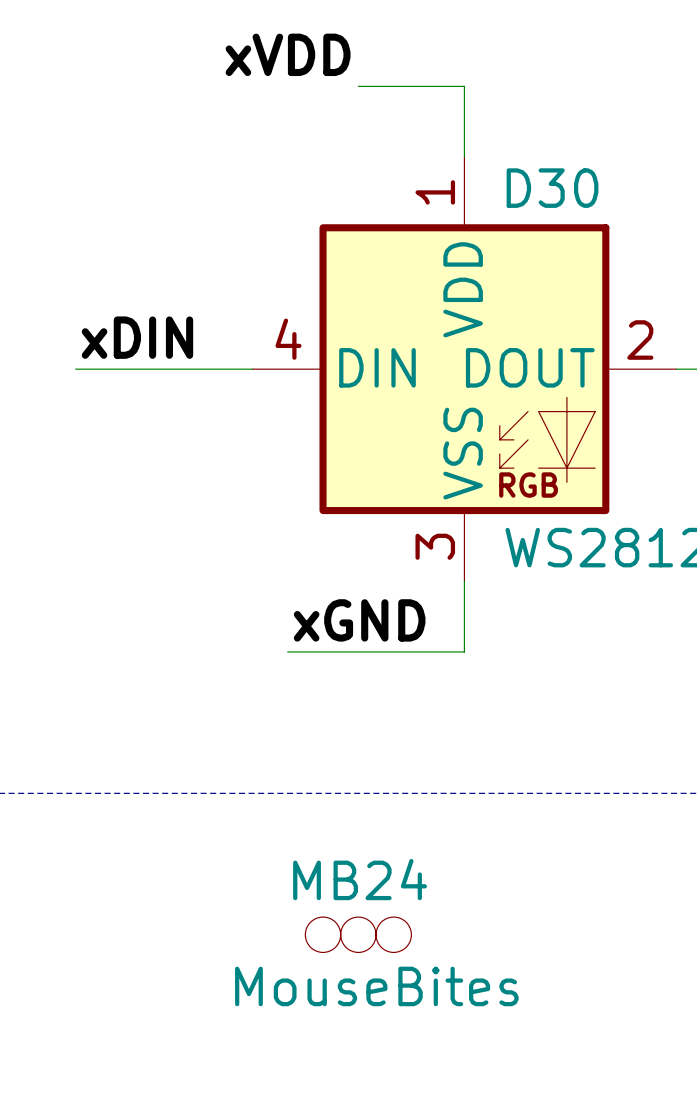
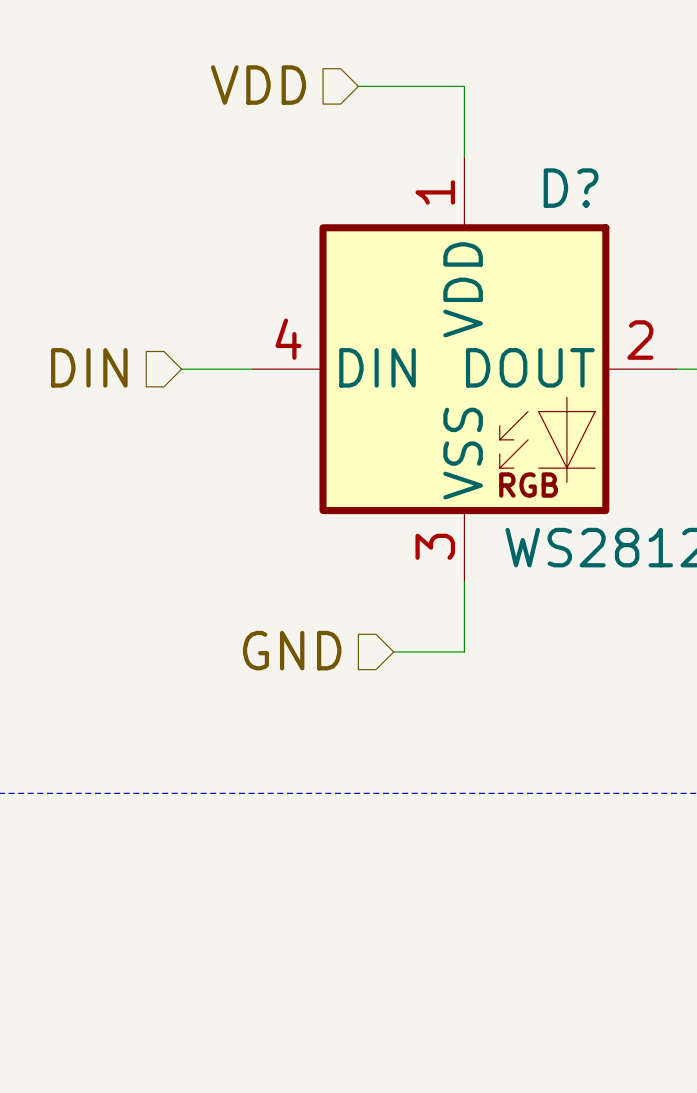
label: xVDD (288, 54) -> none
hierarchical label: none -> VDD (258, 85)
D30 name: D30 (552, 188) -> D? (571, 188)
label: xDIN (137, 337) -> none
hierarchical label: none -> DIN (89, 367)
wire: (75, 369) (181, 369) -> none
label: xGND (359, 620) -> none
hierarchical label: none -> GND (292, 650)
wire: (287, 651) (393, 651) -> none
MB24: MouseBites (358, 934) -> none

